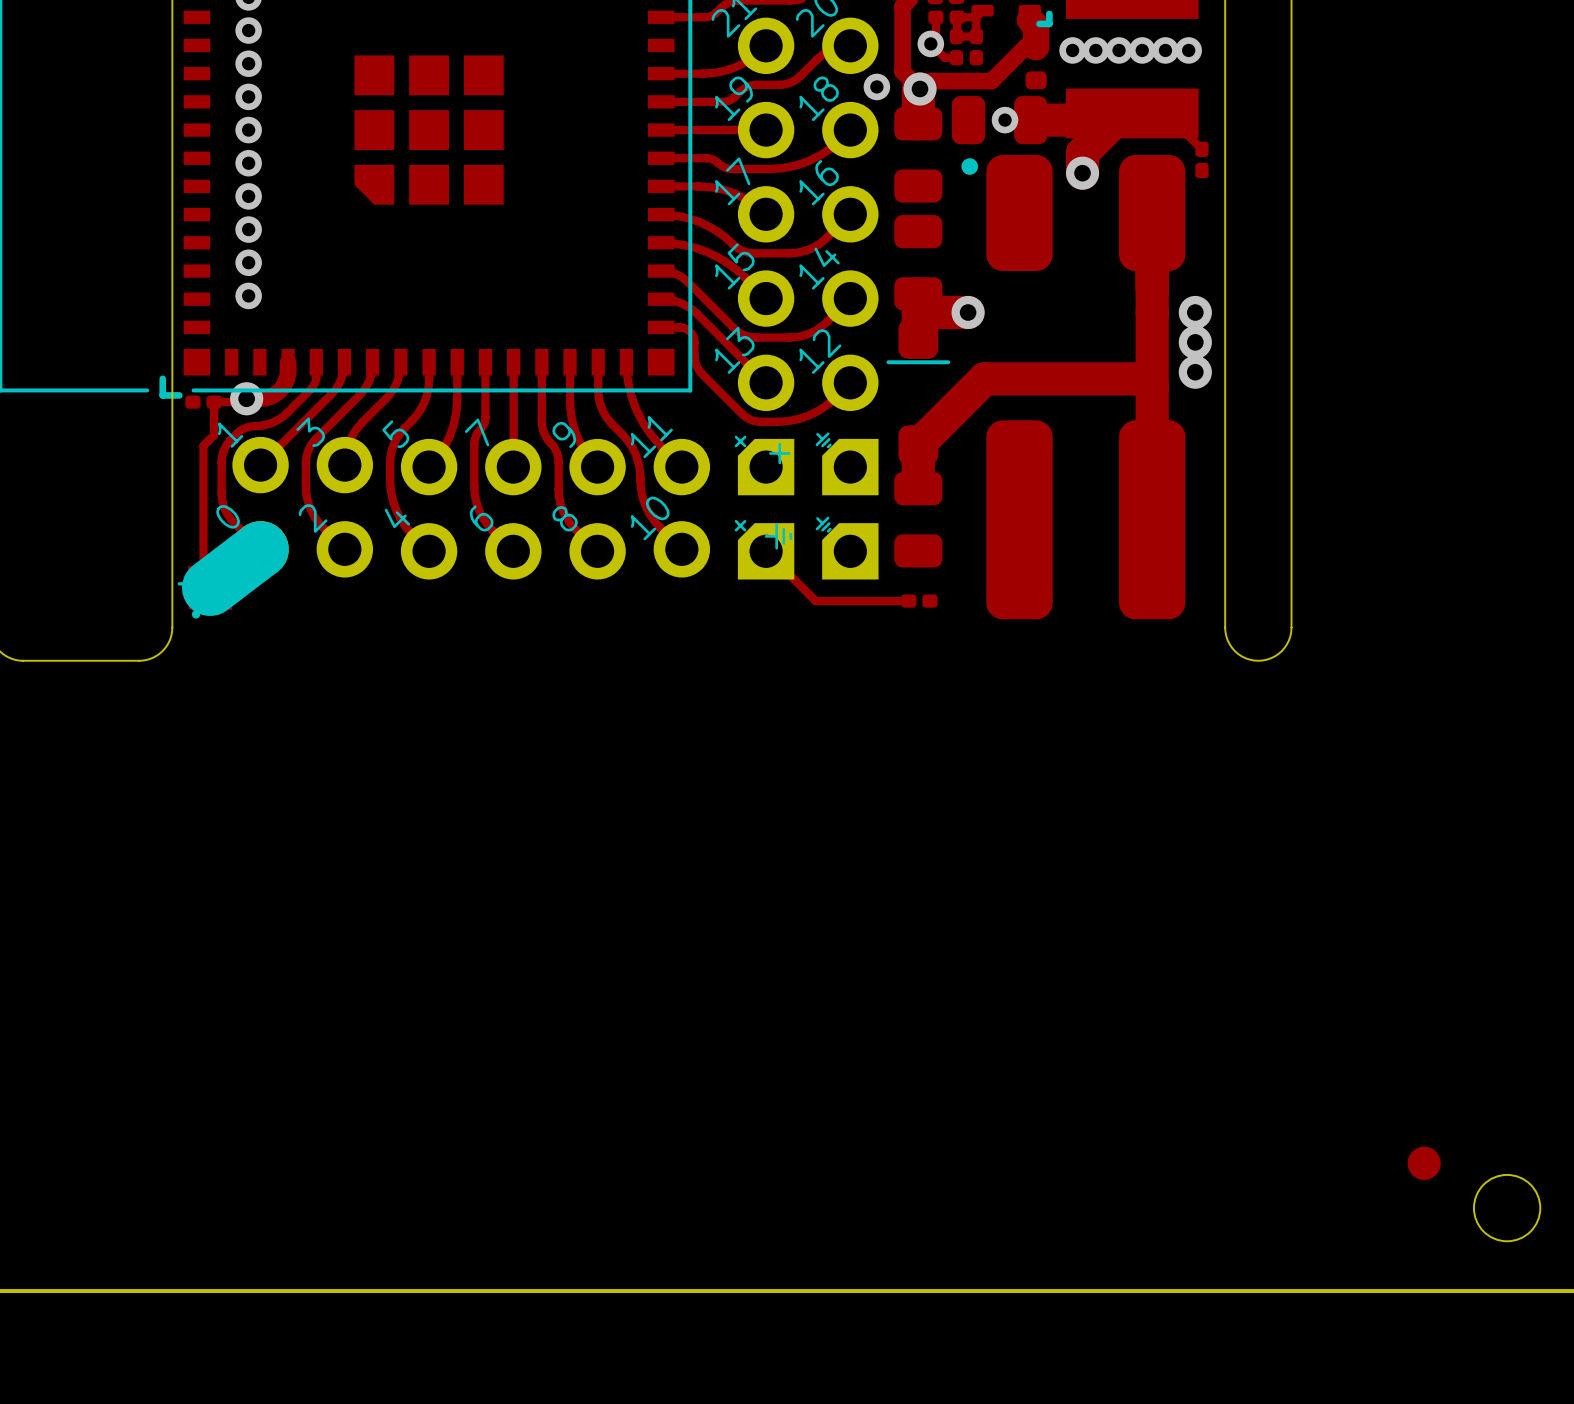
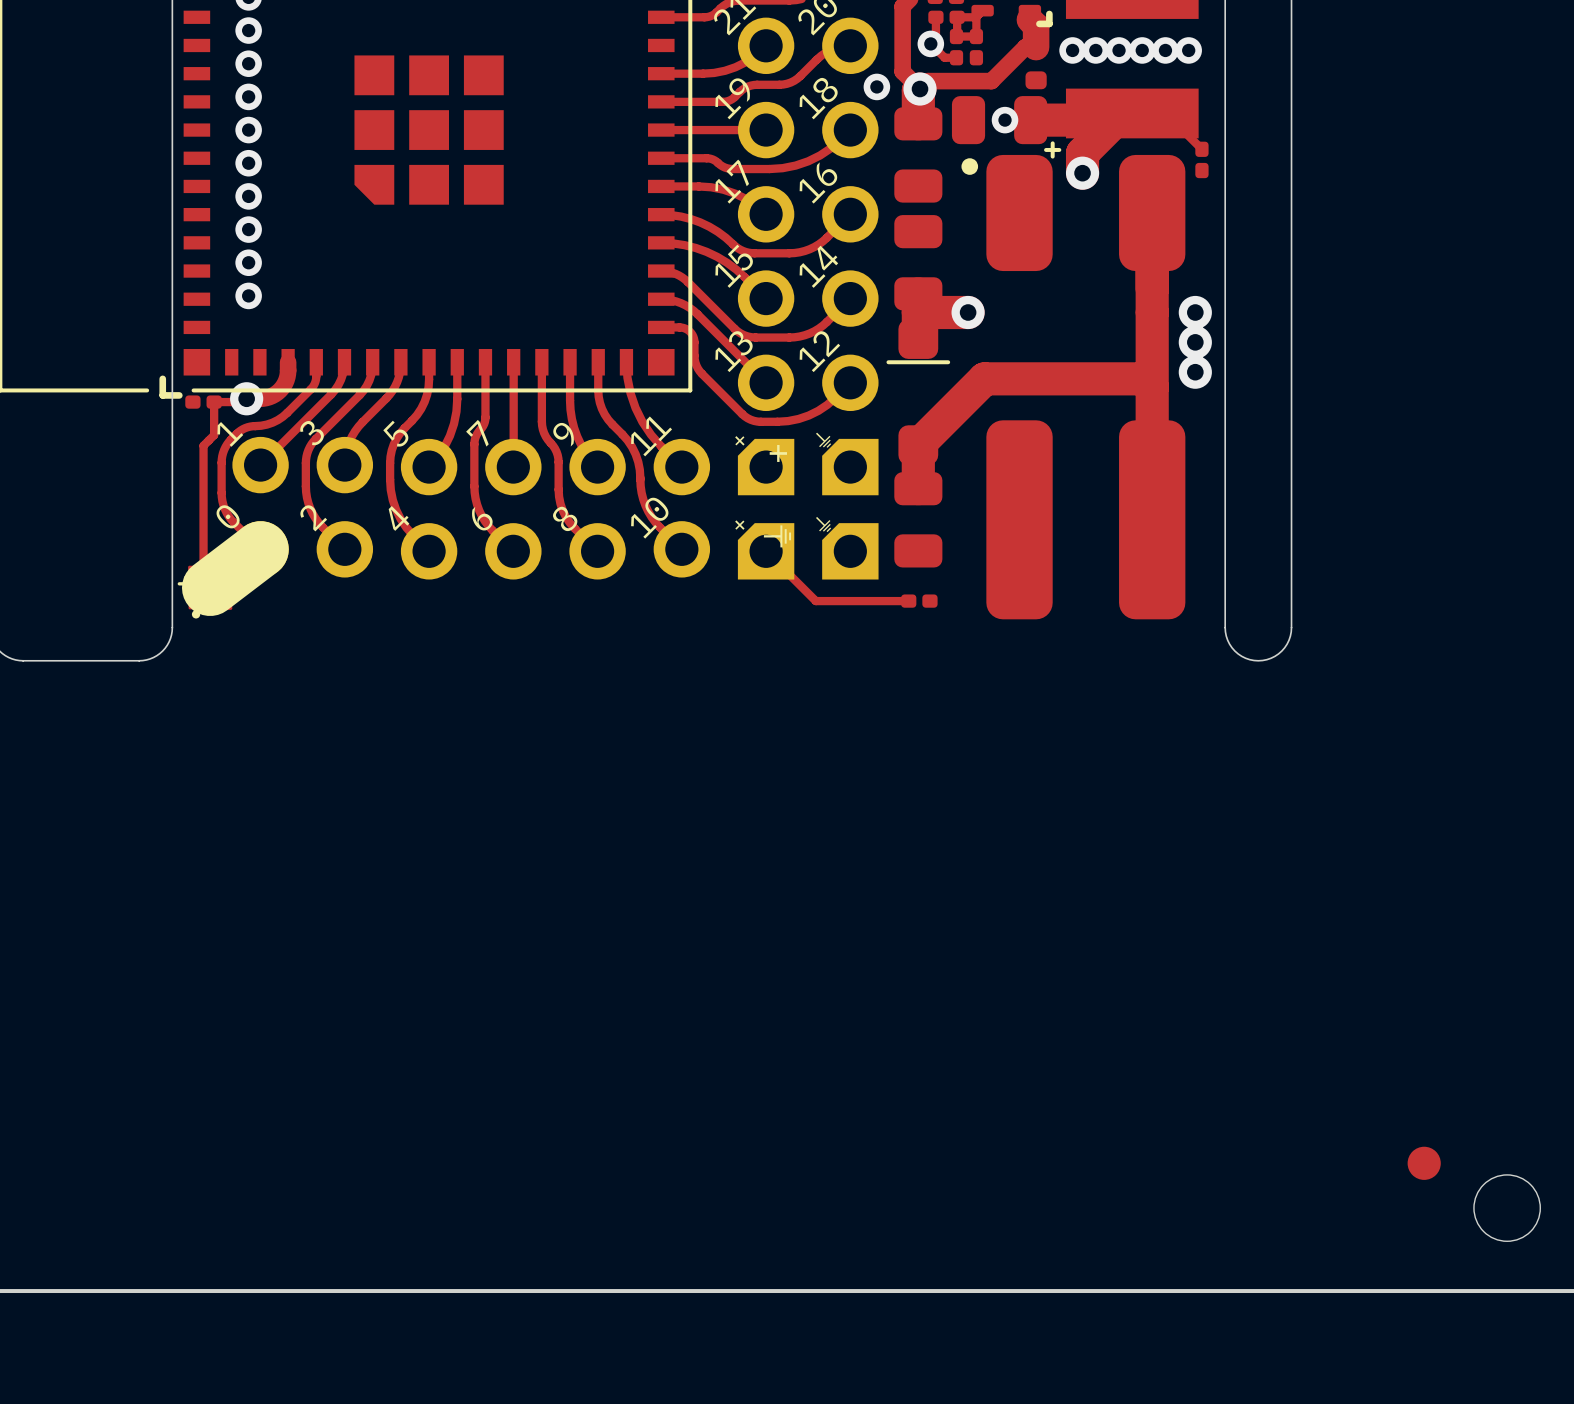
part footprint: [951, 96, 1048, 145] -> [951, 96, 1062, 159]

